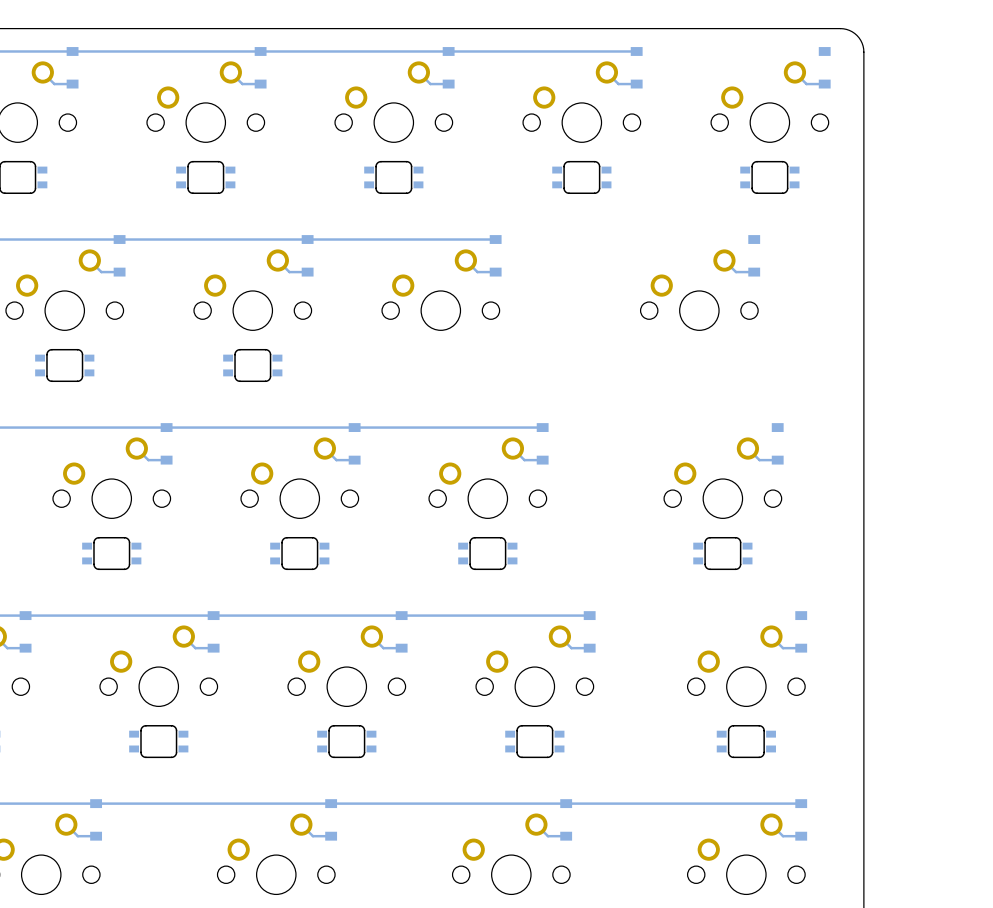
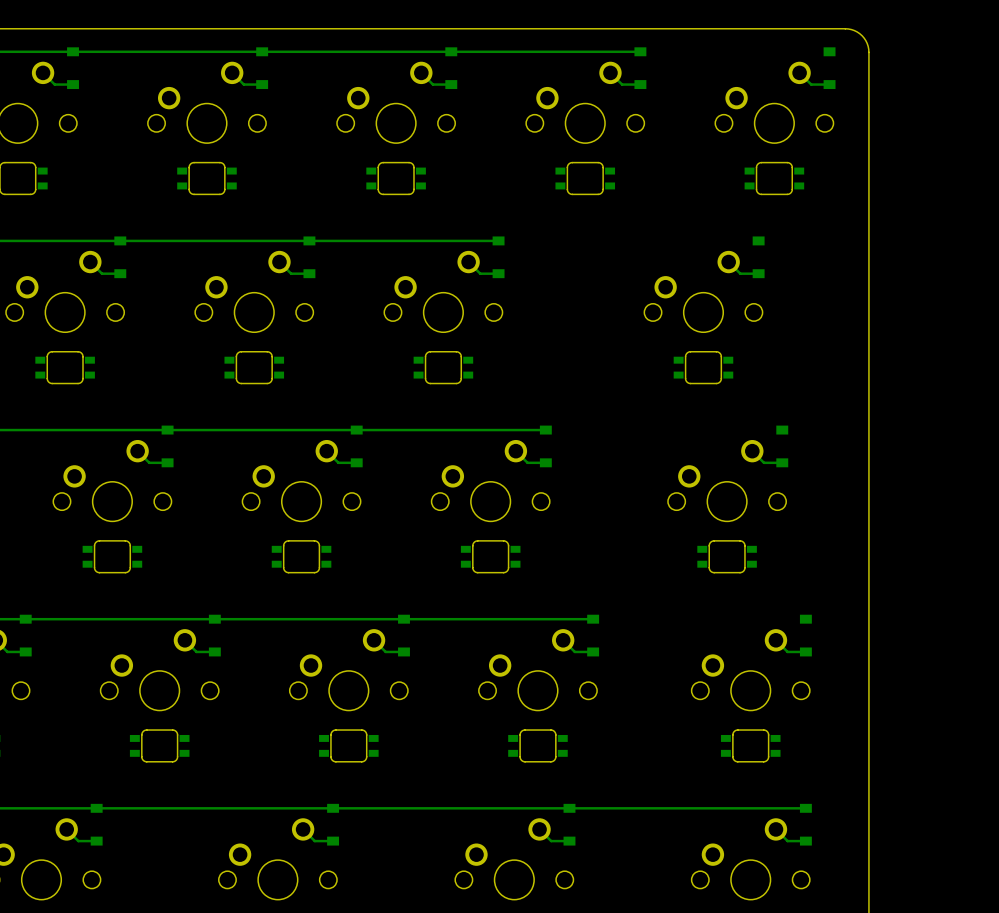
part: none -> (443, 367)
part: none -> (703, 367)

